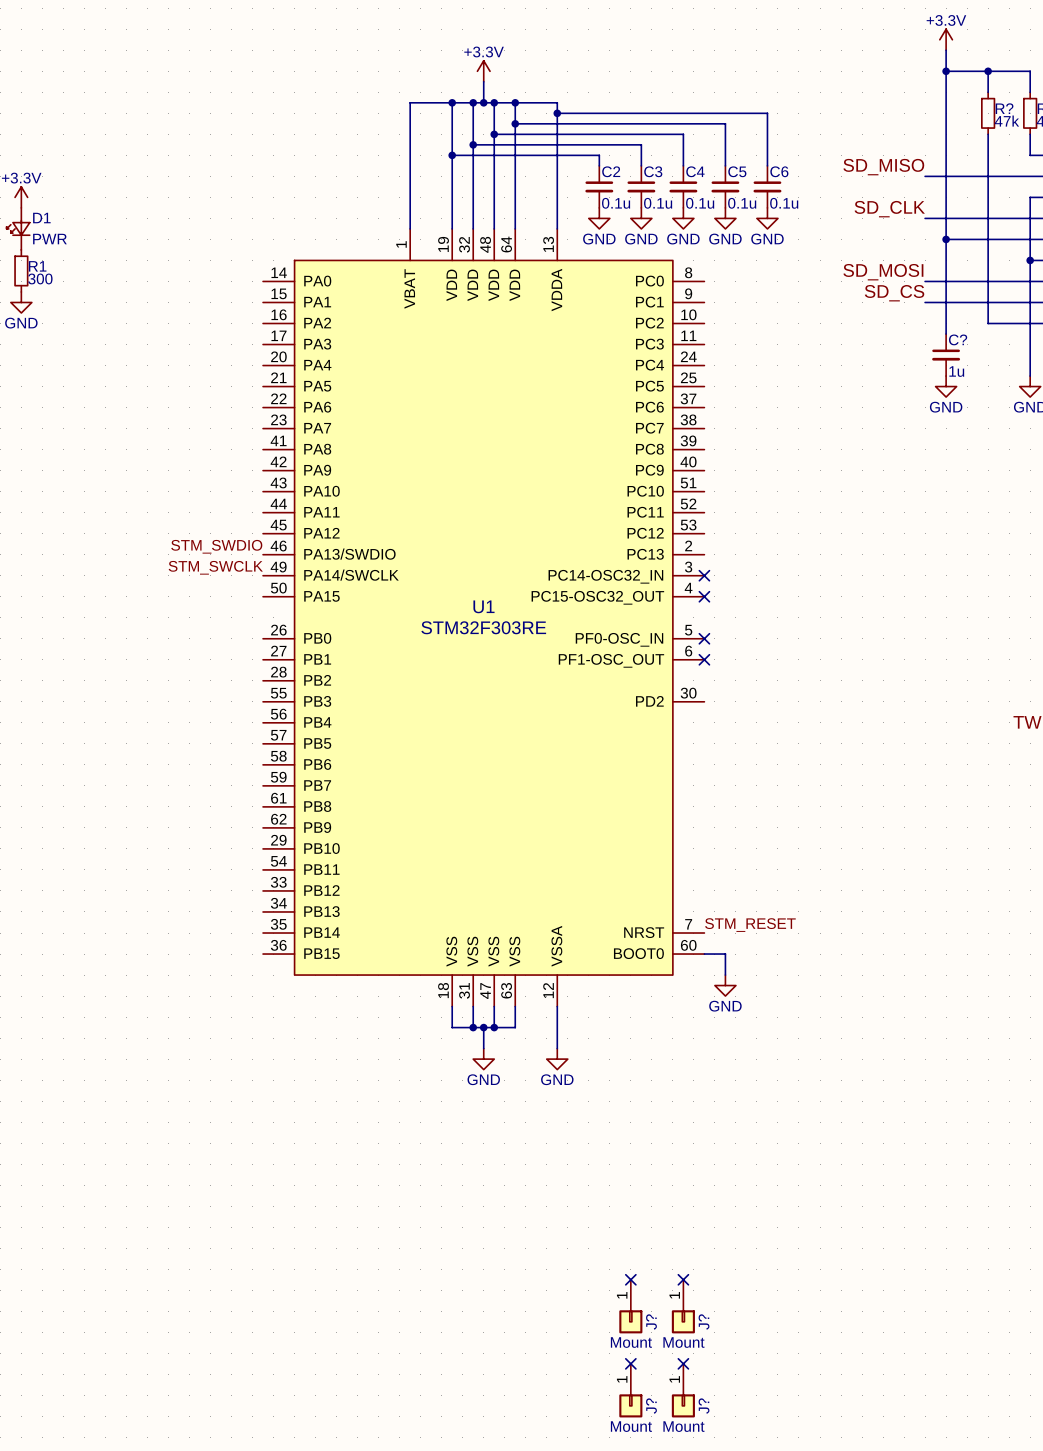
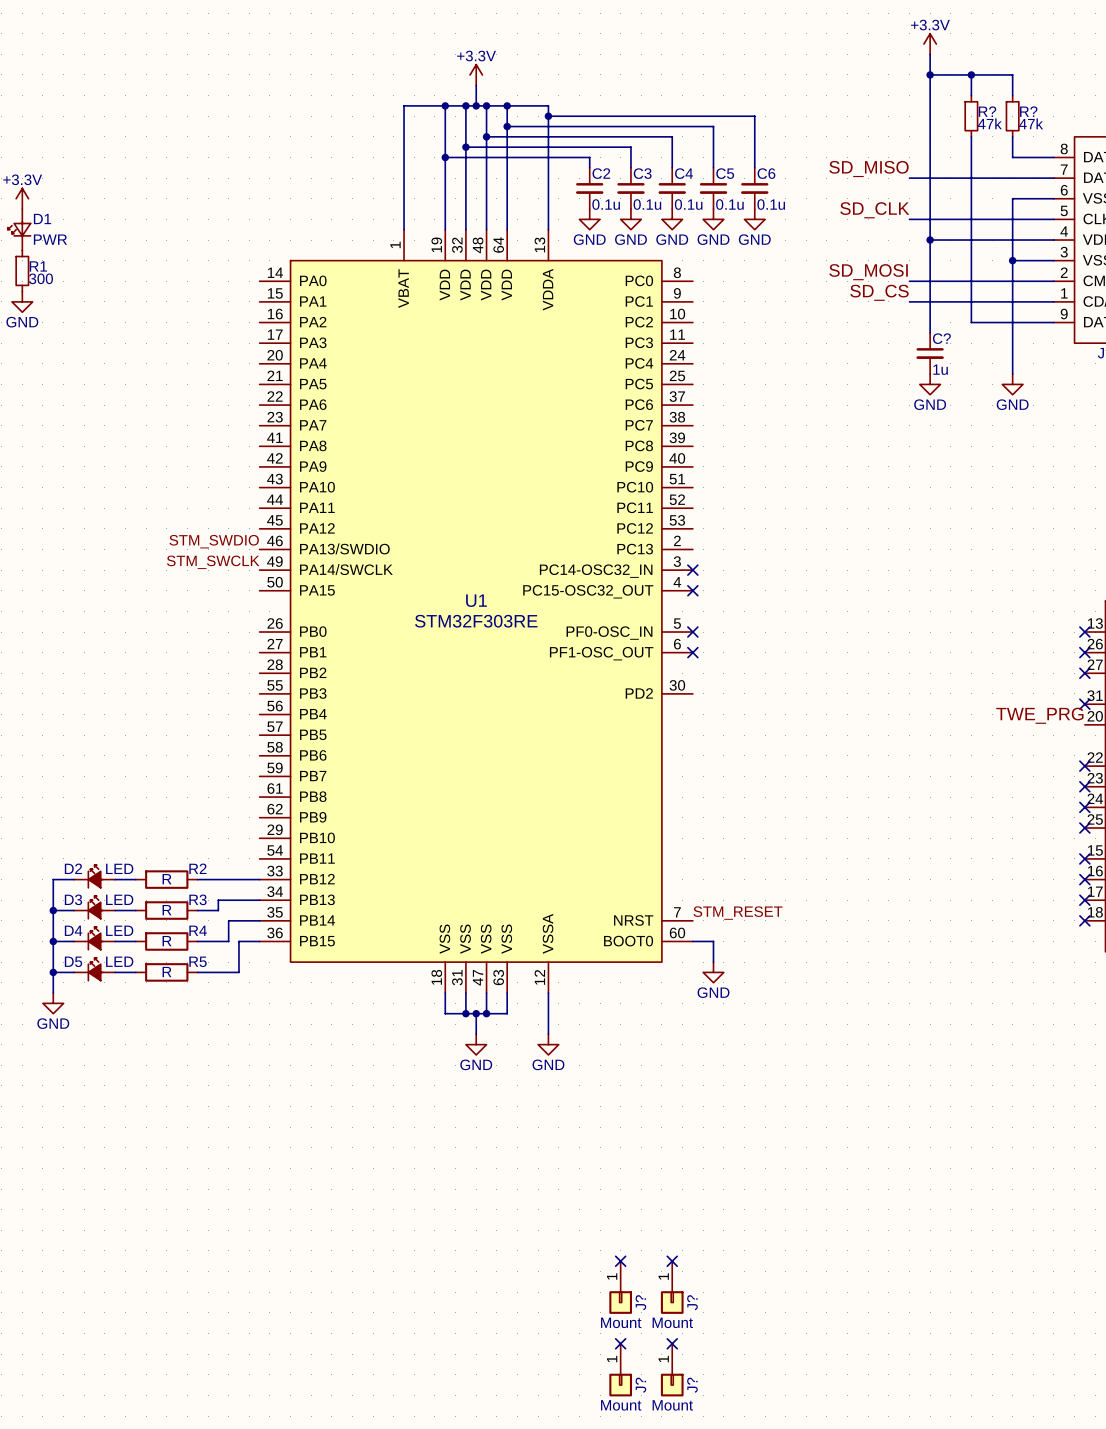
D2: none -> LED (94, 876)
wire: none -> (73, 879) (53, 879) (53, 993)
wire: none -> (115, 879) (135, 879)
R2: none -> R (166, 879)
wire: none -> (197, 879) (259, 879)
wire: none -> (259, 900) (218, 900) (218, 910) (197, 910)
D3: none -> LED (94, 907)
wire: none -> (53, 910) (73, 910)
junction: none -> (53, 910)
wire: none -> (115, 910) (135, 910)
R3: none -> R (166, 910)
wire: none -> (259, 920) (228, 920) (228, 941) (197, 941)
D4: none -> LED (94, 938)
wire: none -> (53, 941) (73, 941)
junction: none -> (53, 941)
wire: none -> (115, 941) (135, 941)
R4: none -> R (166, 941)
wire: none -> (259, 941) (238, 941) (238, 972) (197, 972)
D5: none -> LED (94, 969)
wire: none -> (53, 972) (73, 972)
junction: none -> (53, 972)
wire: none -> (115, 972) (135, 972)
R5: none -> R (166, 972)
power symbol: none -> GND (53, 1003)

